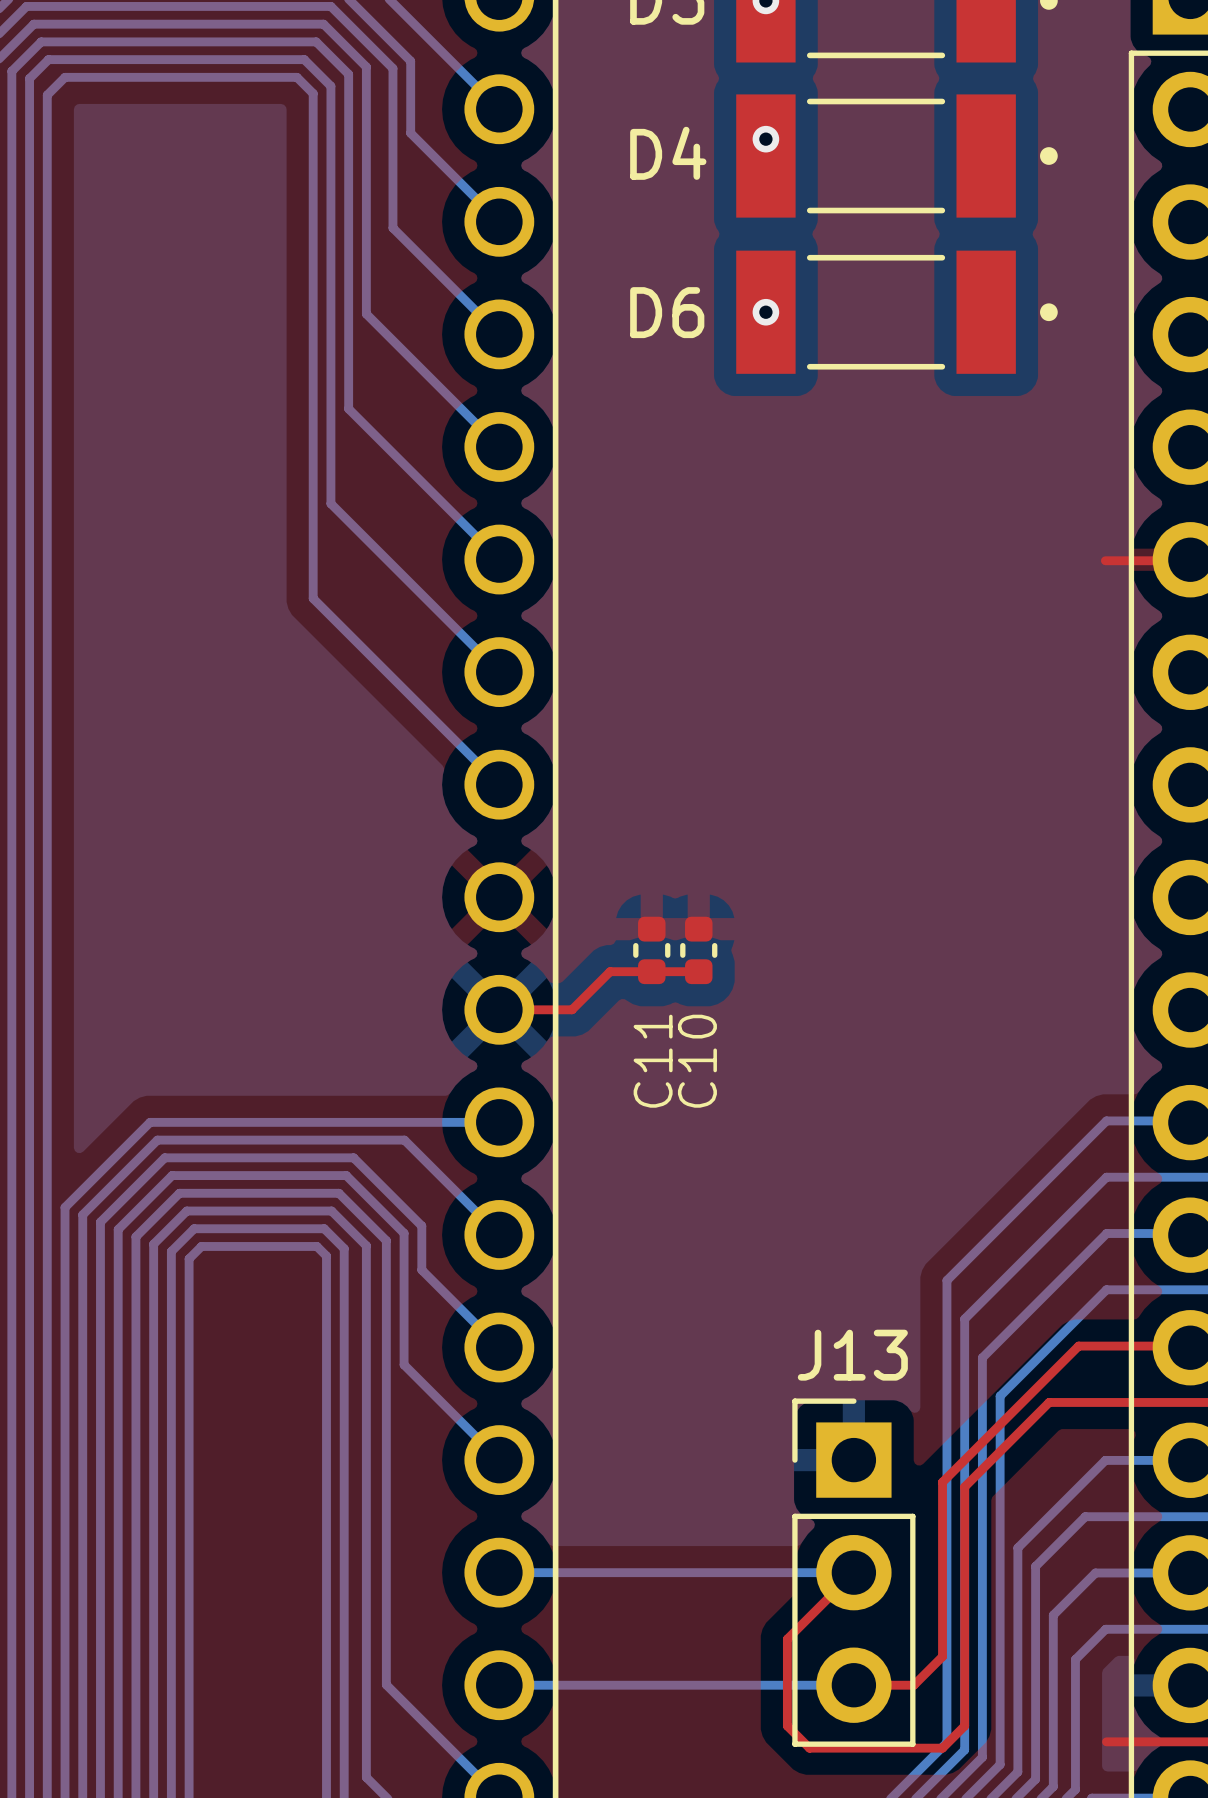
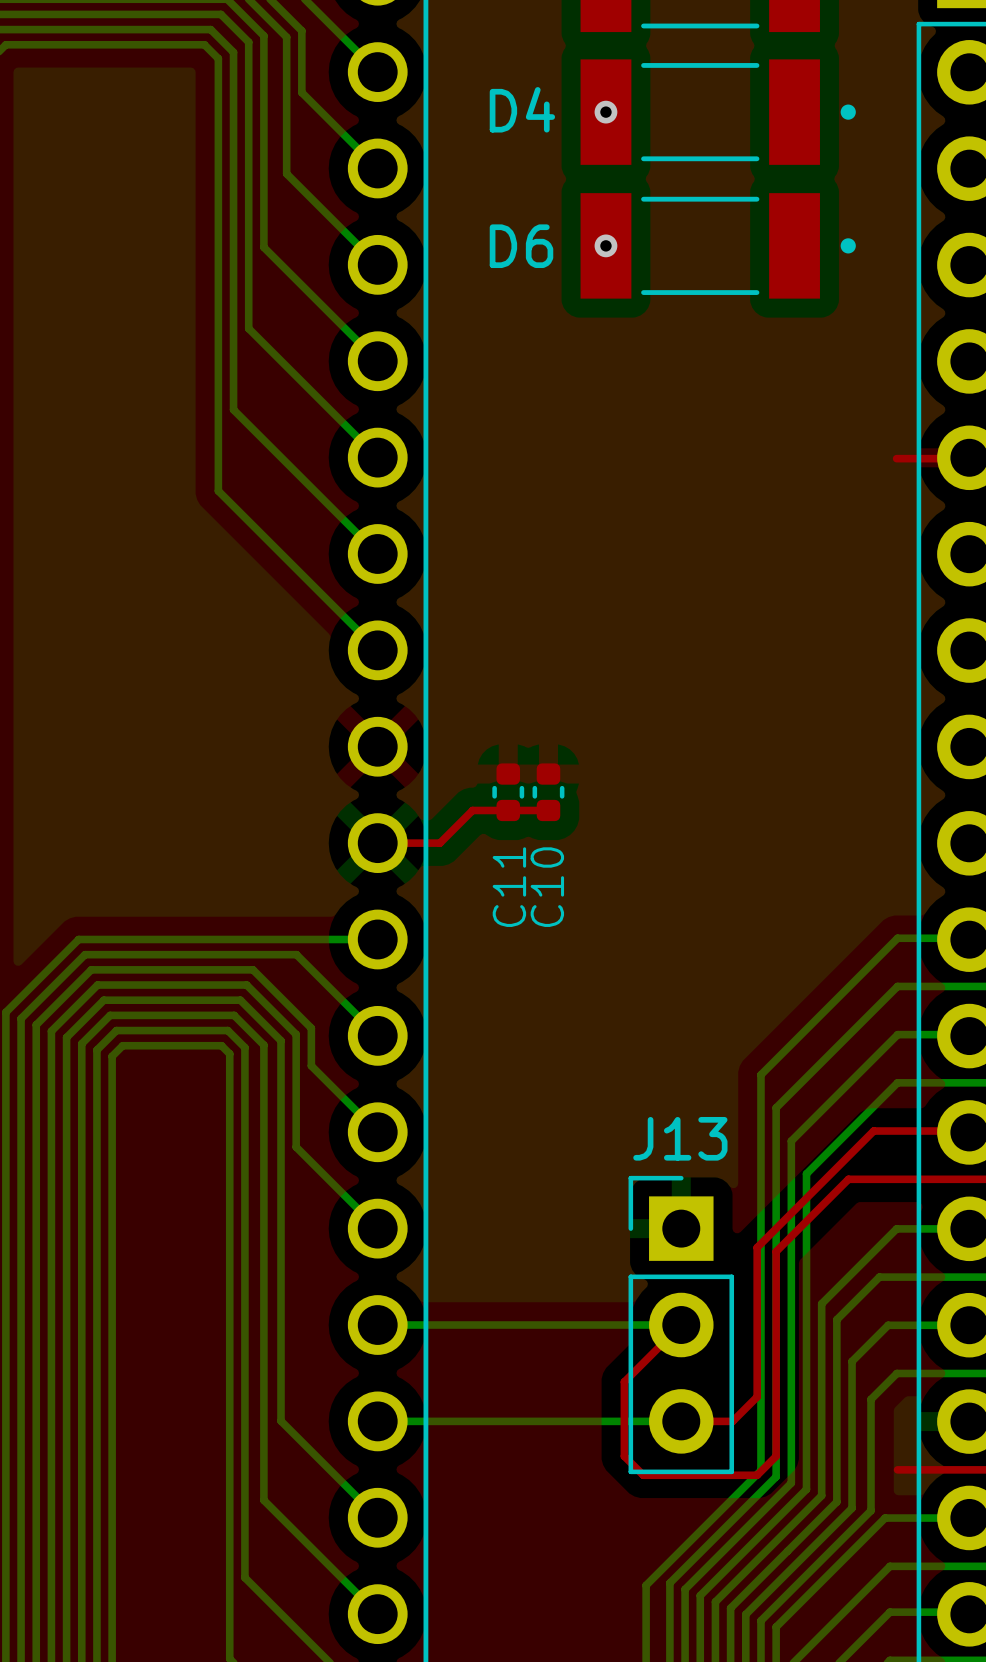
via position: (765, 139) -> (605, 112)

